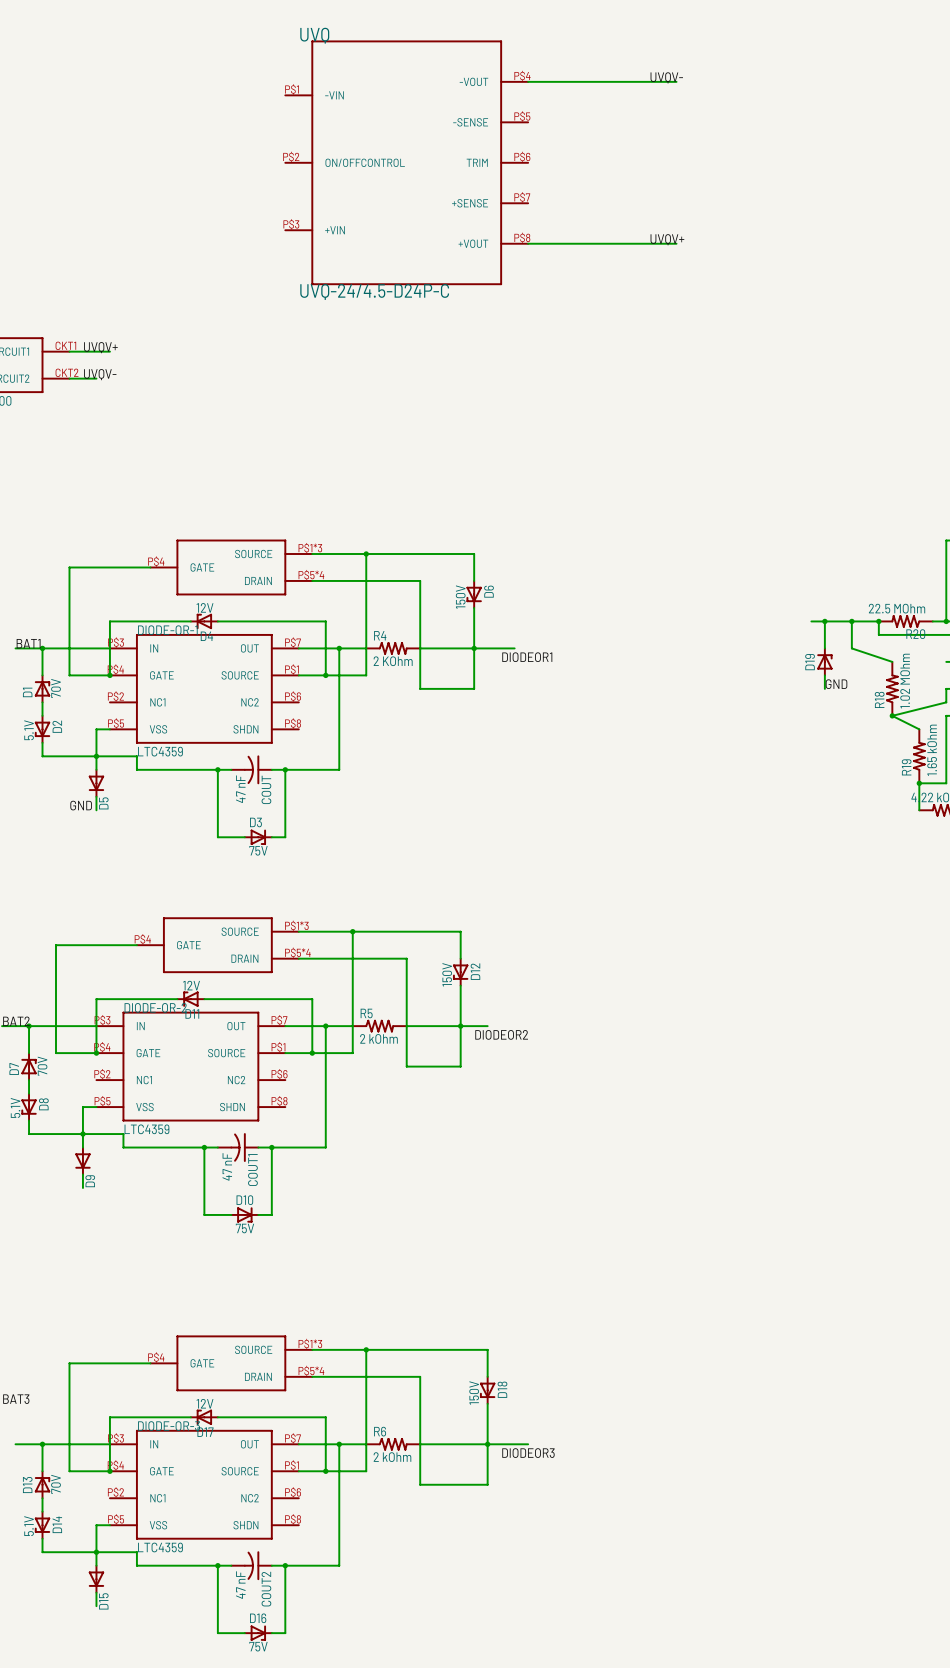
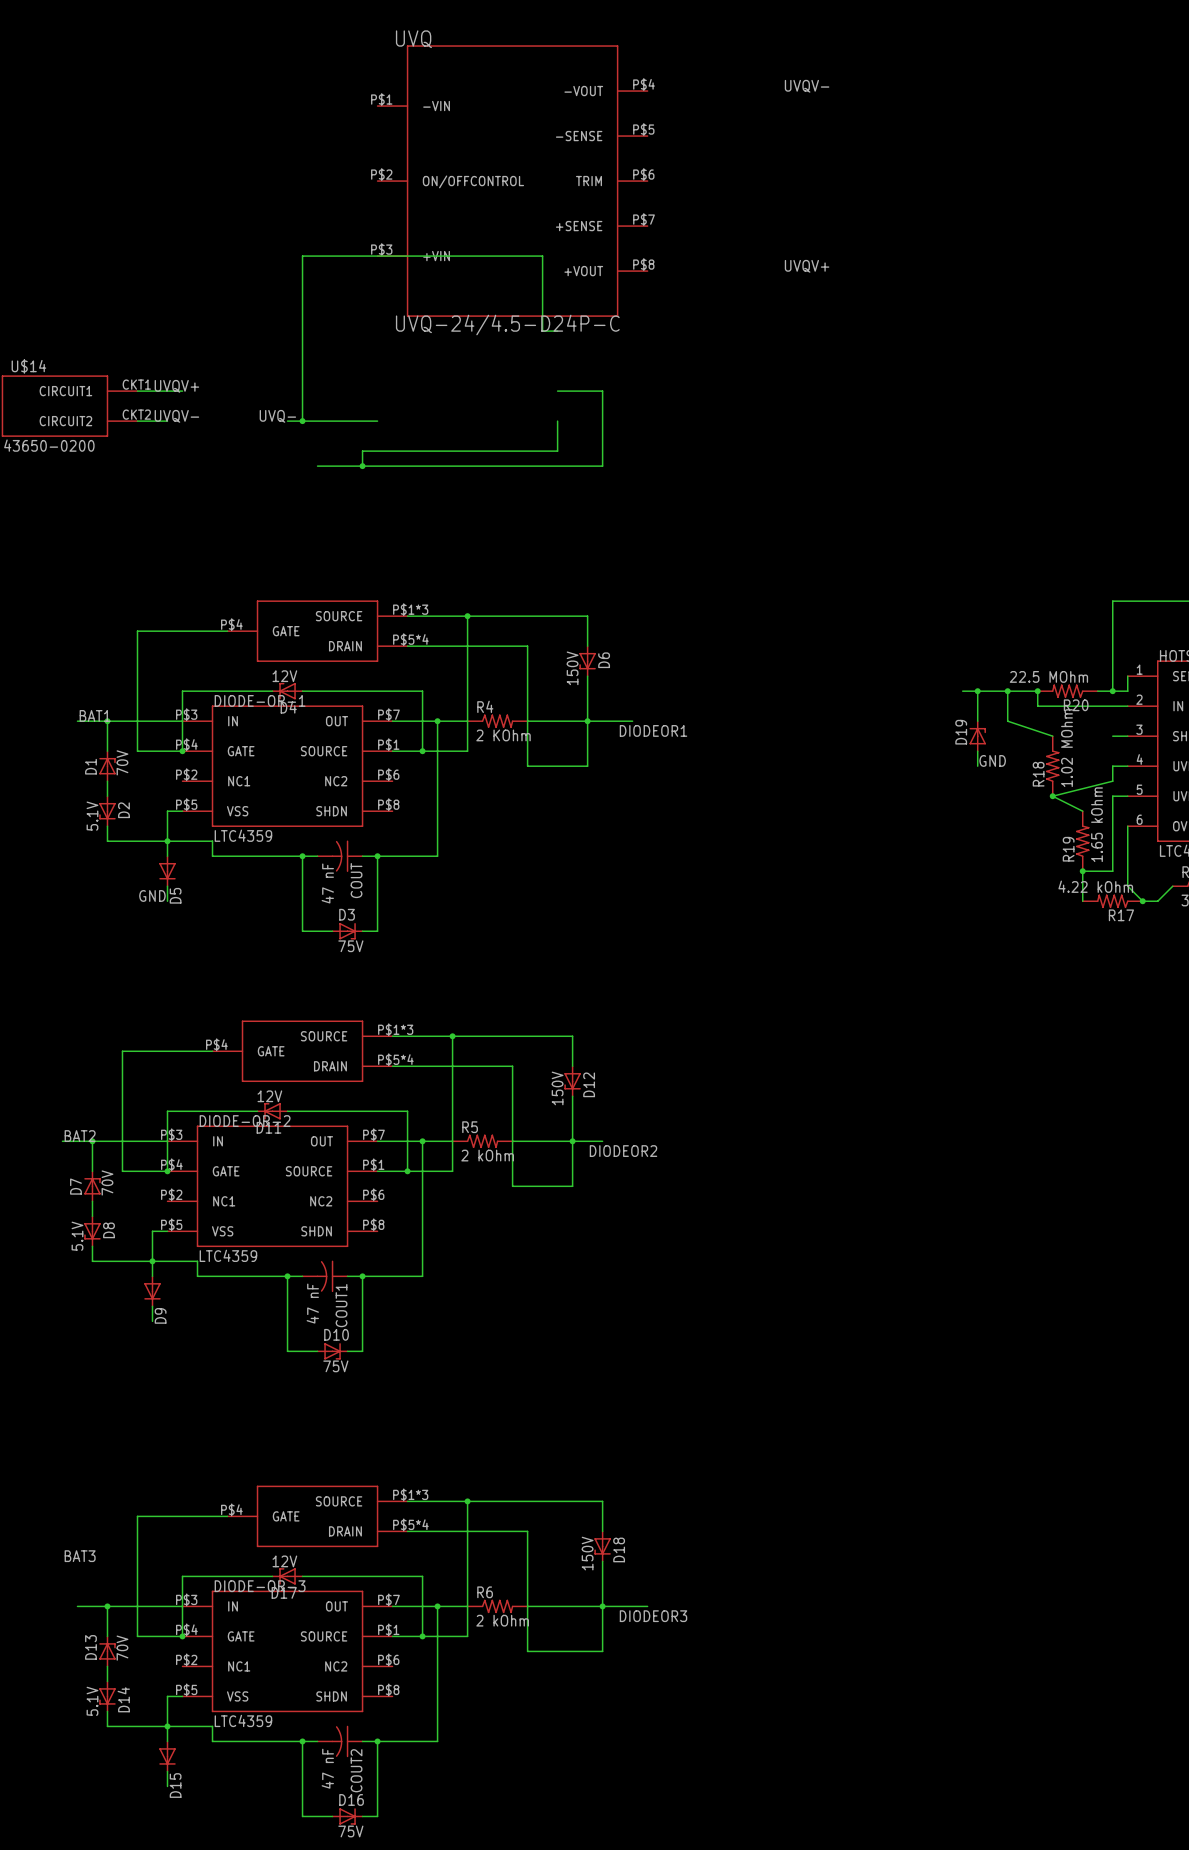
wire: (528, 81) (676, 81) -> none
wire: (528, 243) (676, 243) -> none
wire: none -> (557, 331) (542, 331) (542, 256) (302, 256) (302, 421)
wire: none -> (557, 391) (602, 391) (602, 466) (317, 466)
label: none -> UVQ- (277, 416)
wire: none -> (287, 421) (377, 421)
junction: none -> (302, 421)
wire: none -> (557, 421) (557, 451) (362, 451) (362, 466)
junction: none -> (362, 466)

